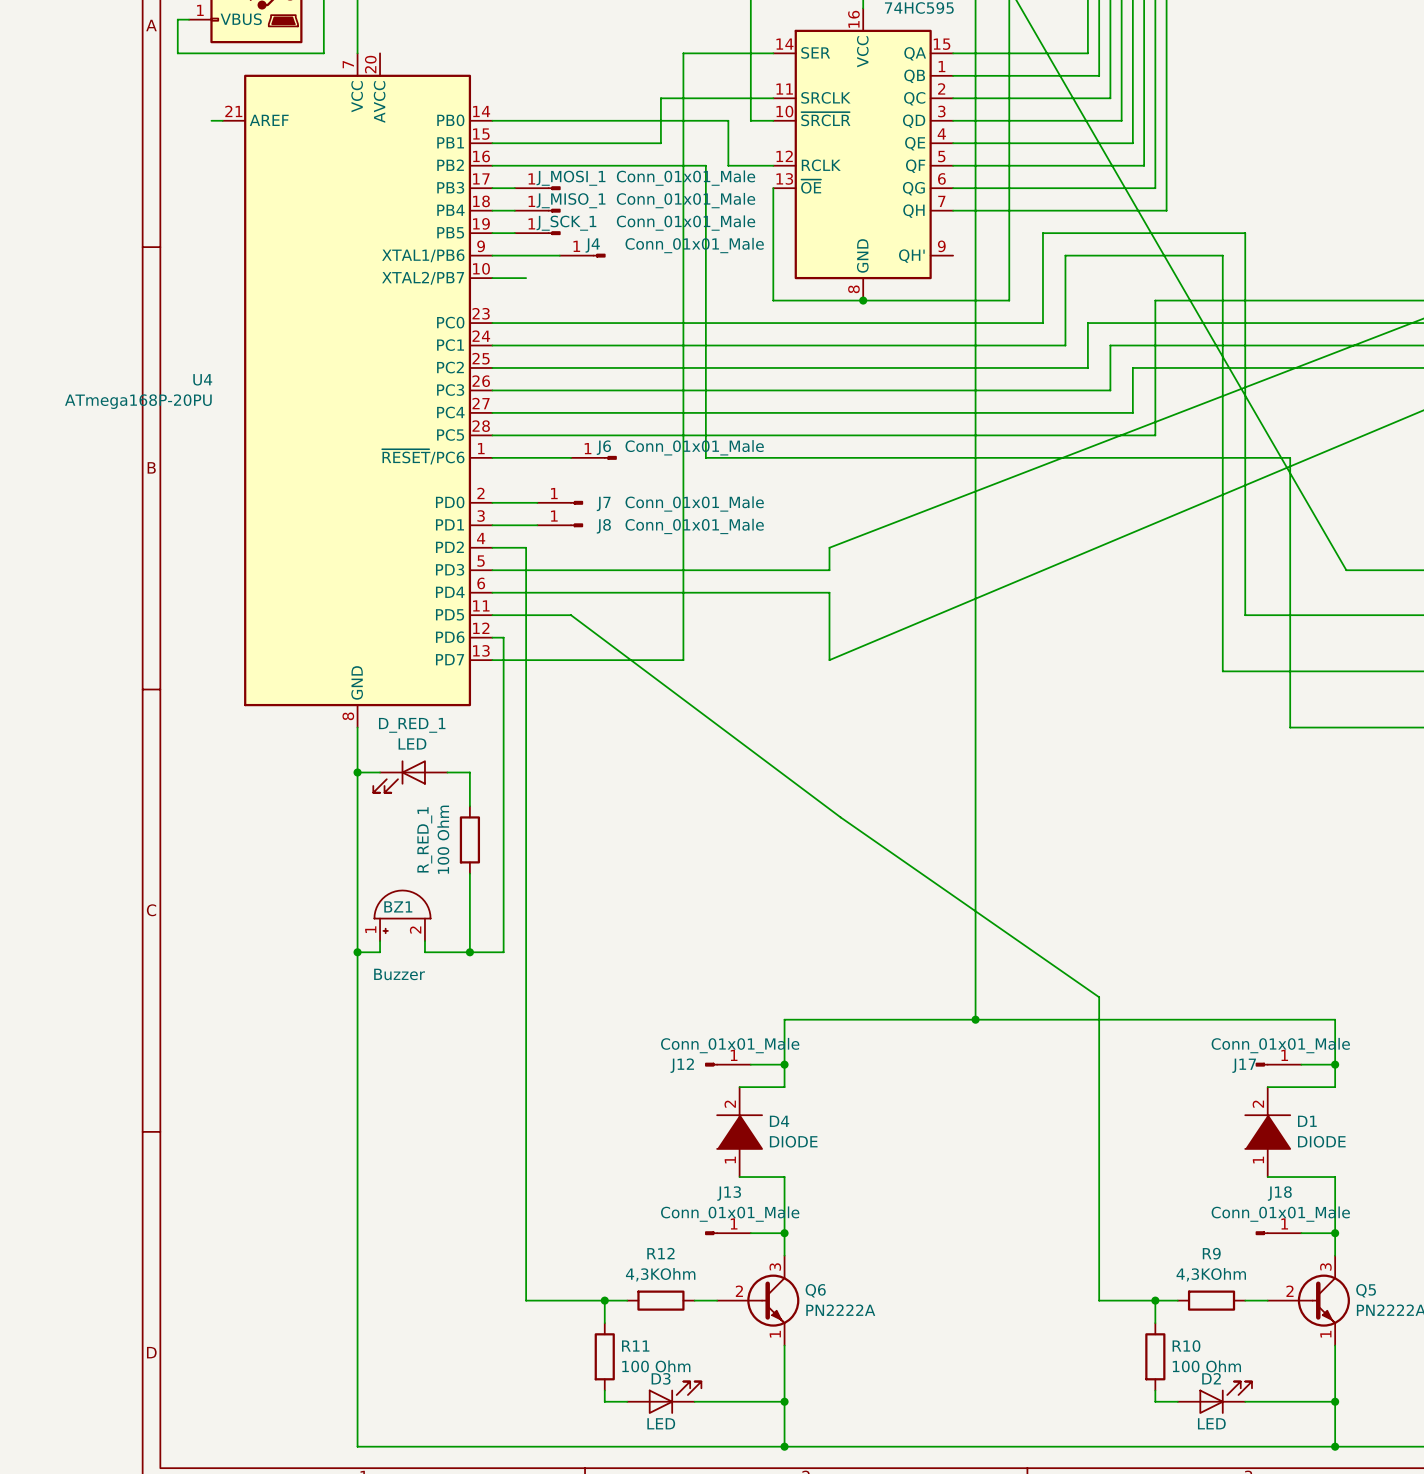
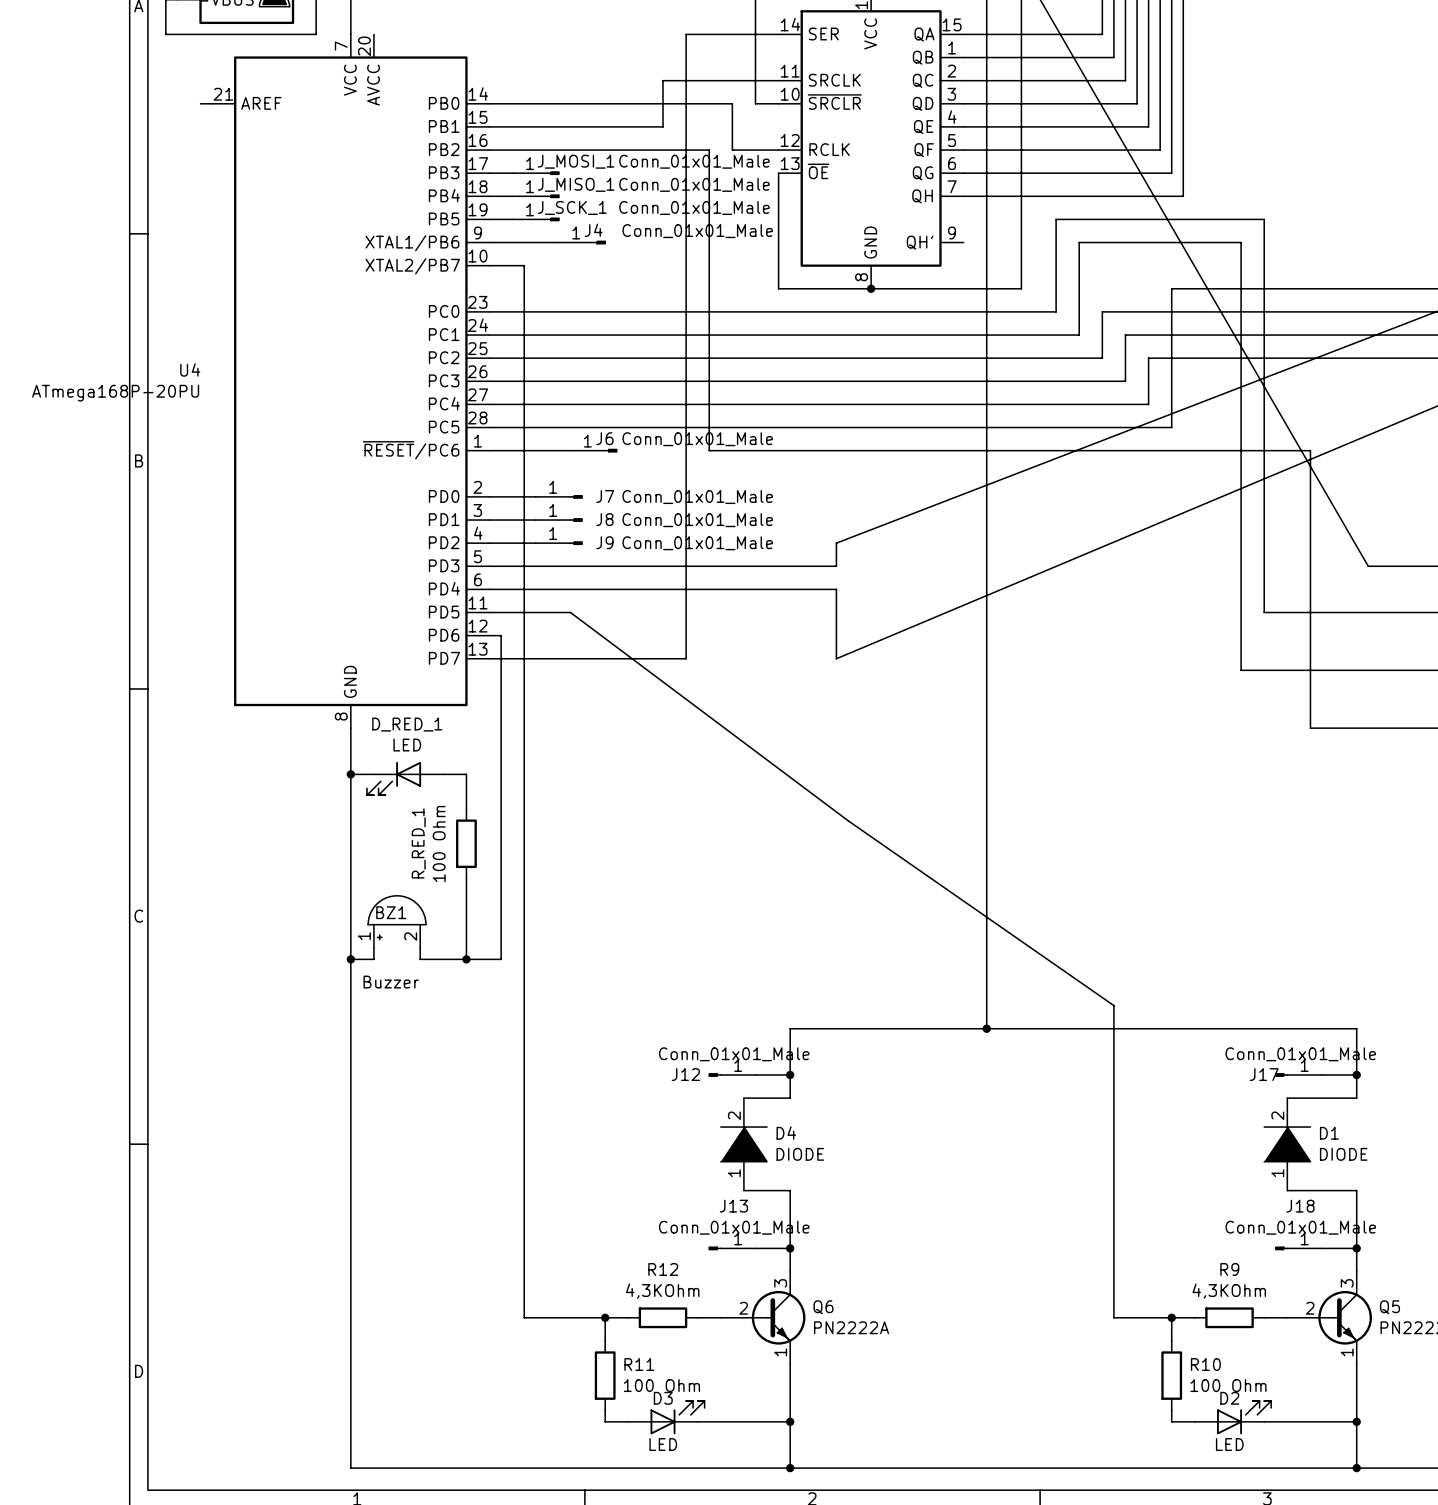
wire: none -> (524, 265) (524, 543) (535, 543)
J9: none -> Conn_01x01_Male (559, 543)

